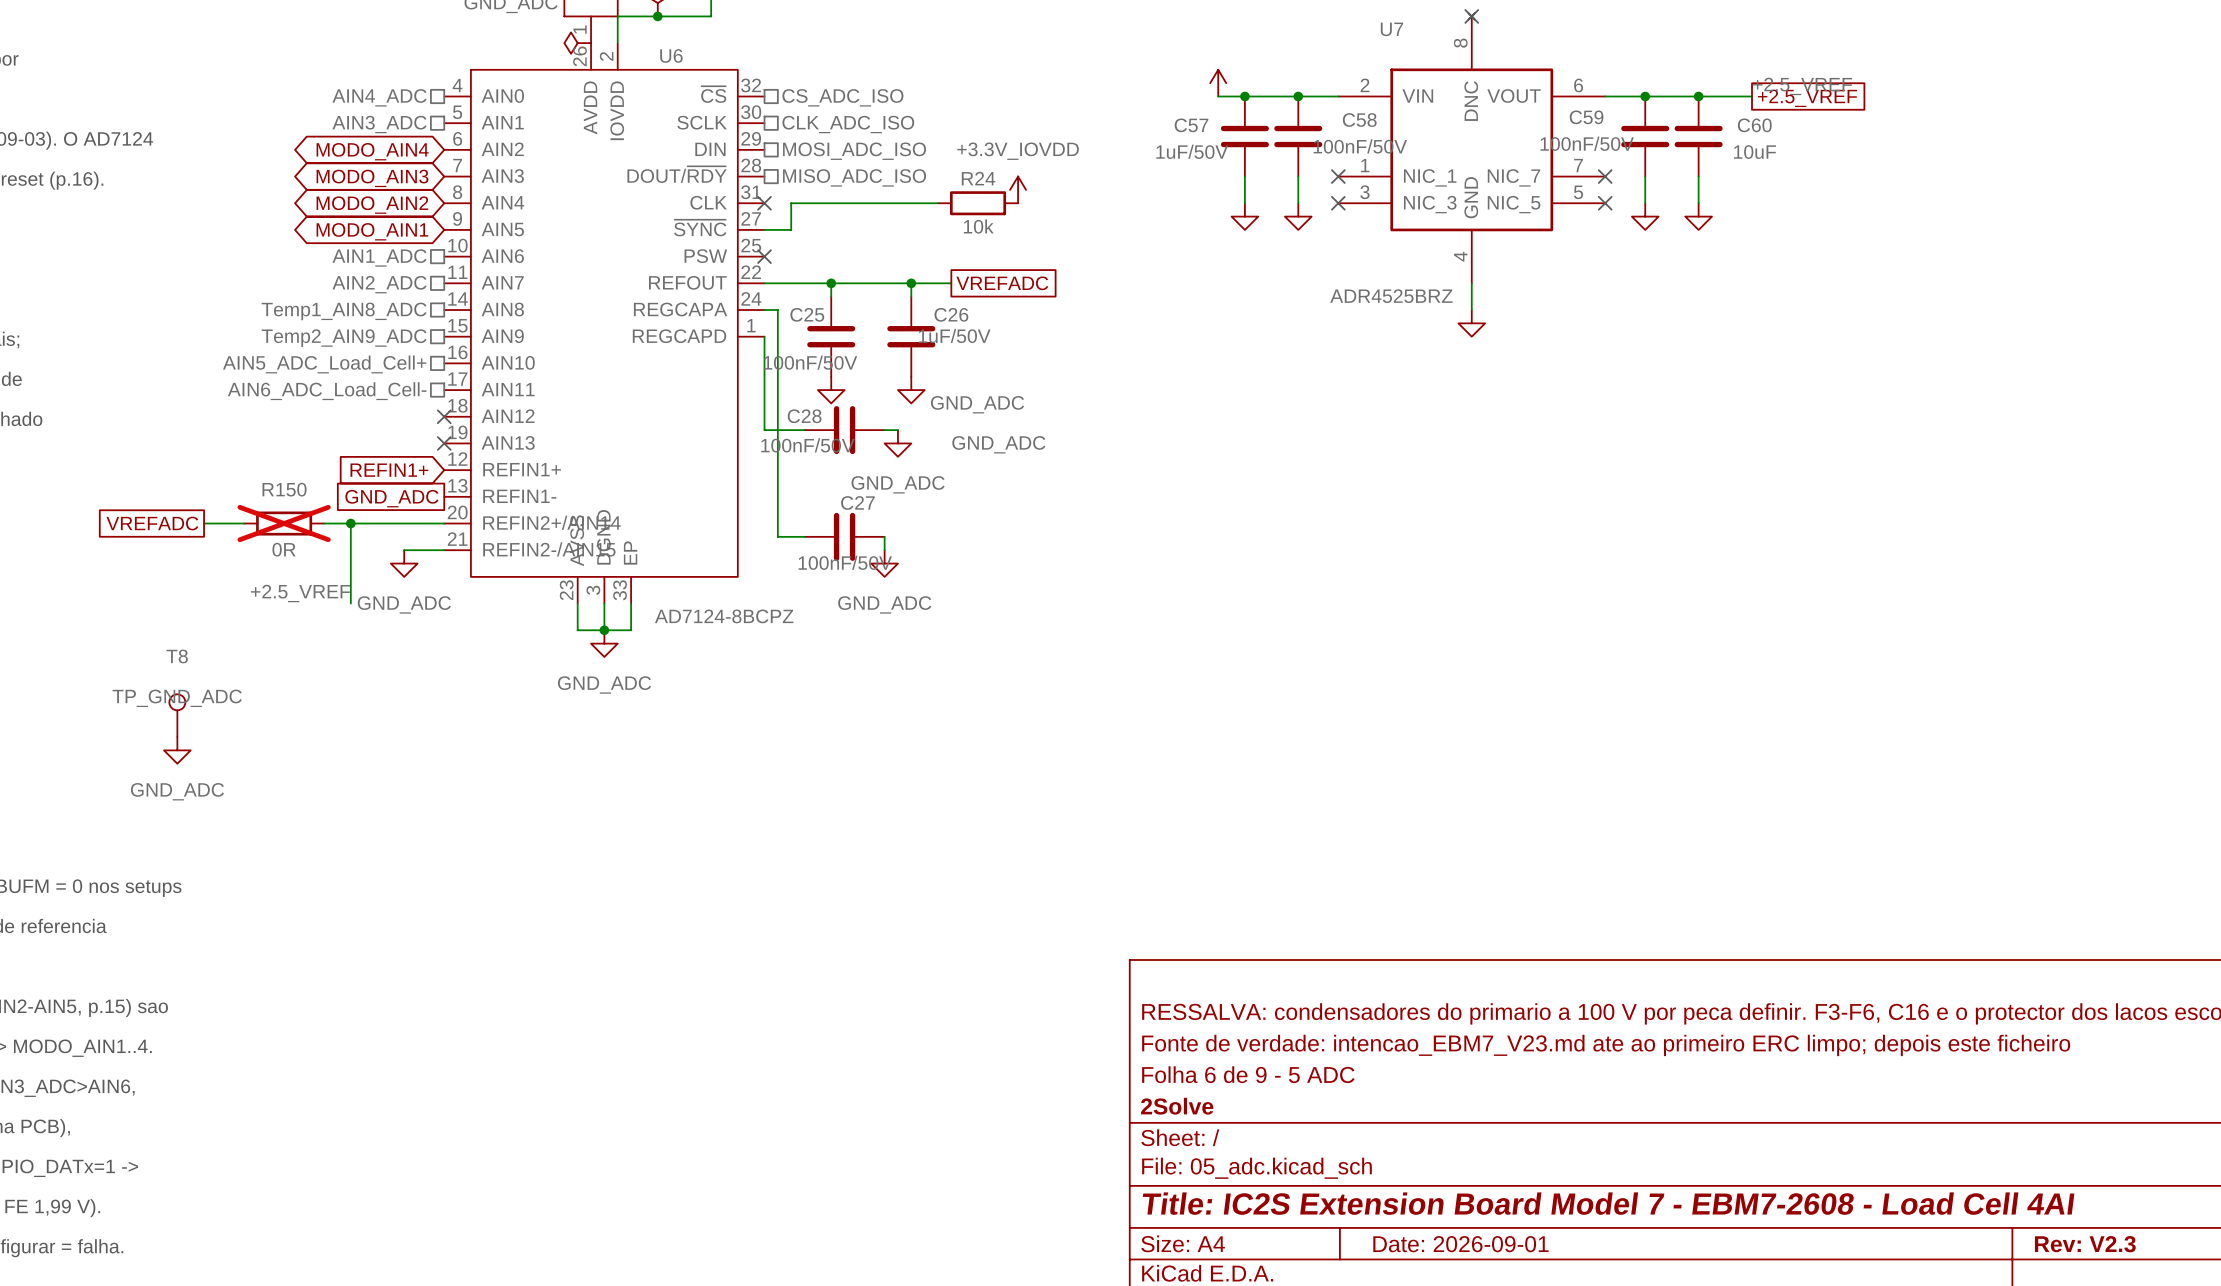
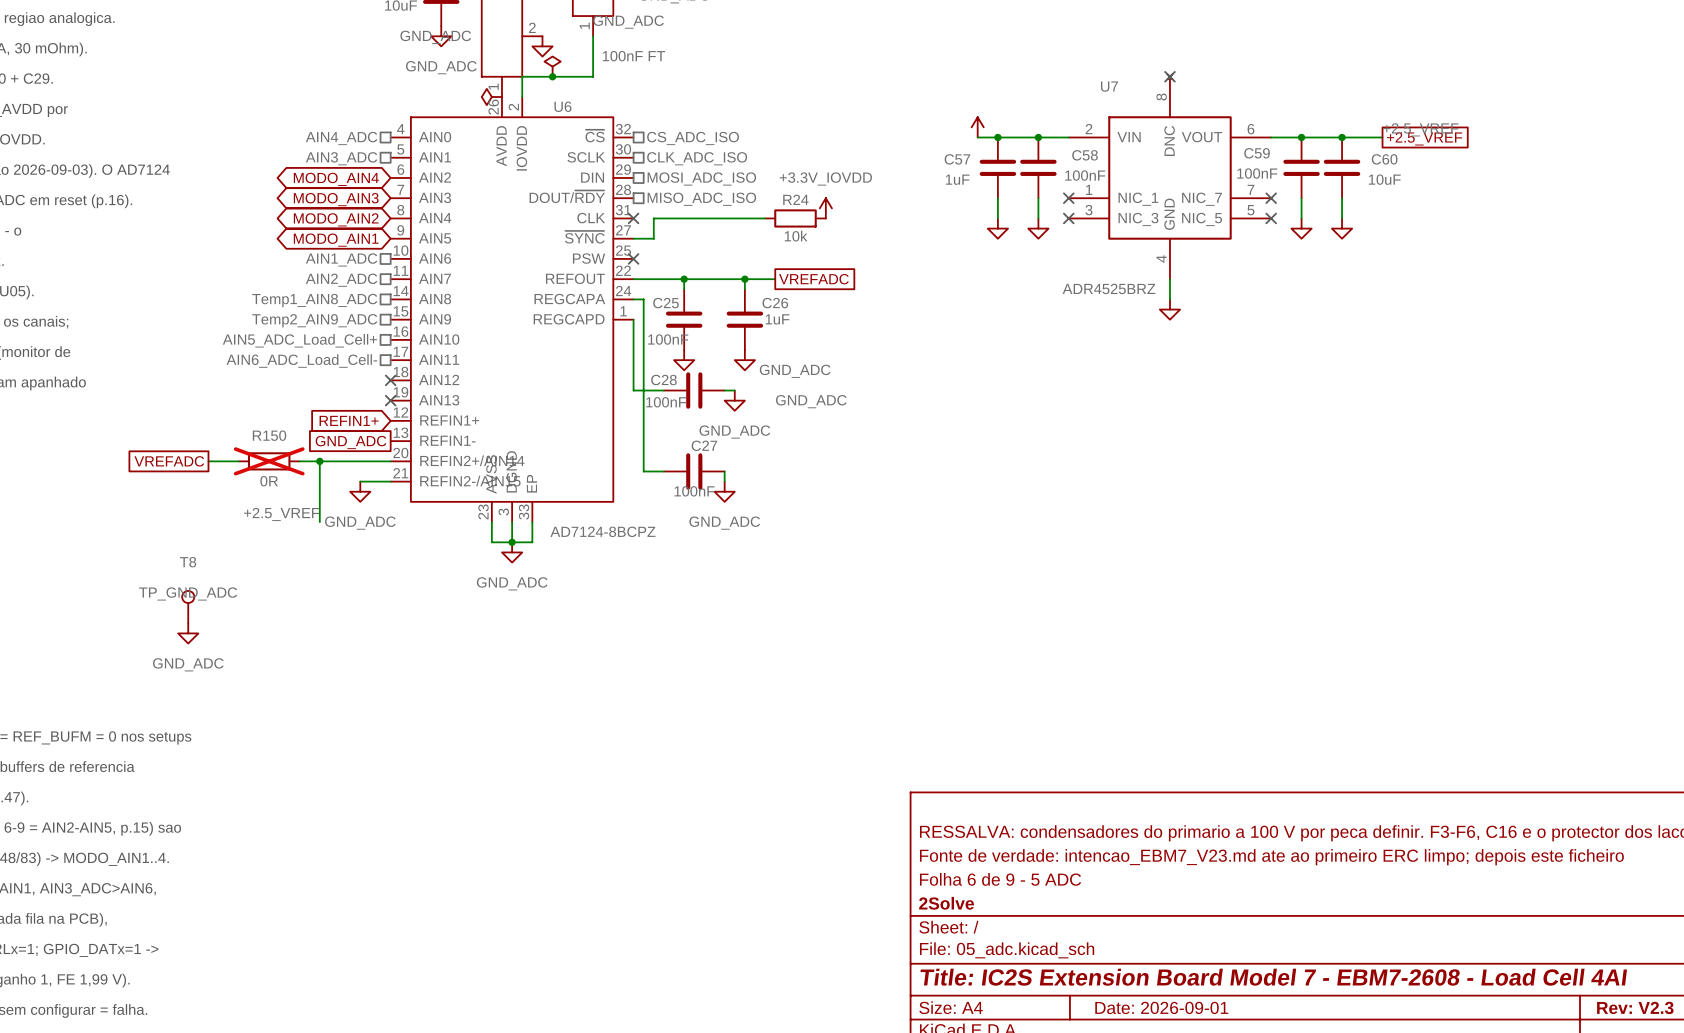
C59 value: 100nF/50V (1587, 143) -> 100nF (1257, 173)
C58 value: 100nF/50V (1360, 146) -> 100nF (1085, 175)
C57 value: 1uF/50V (1192, 151) -> 1uF (957, 179)
C26 value: 1uF/50V (954, 335) -> 1uF (777, 319)
C25 value: 100nF/50V (810, 362) -> 100nF (668, 339)
C28 value: 100nF/50V (807, 445) -> 100nF (666, 402)
C27 value: 100nF/50V (845, 562) -> 100nF (694, 491)

